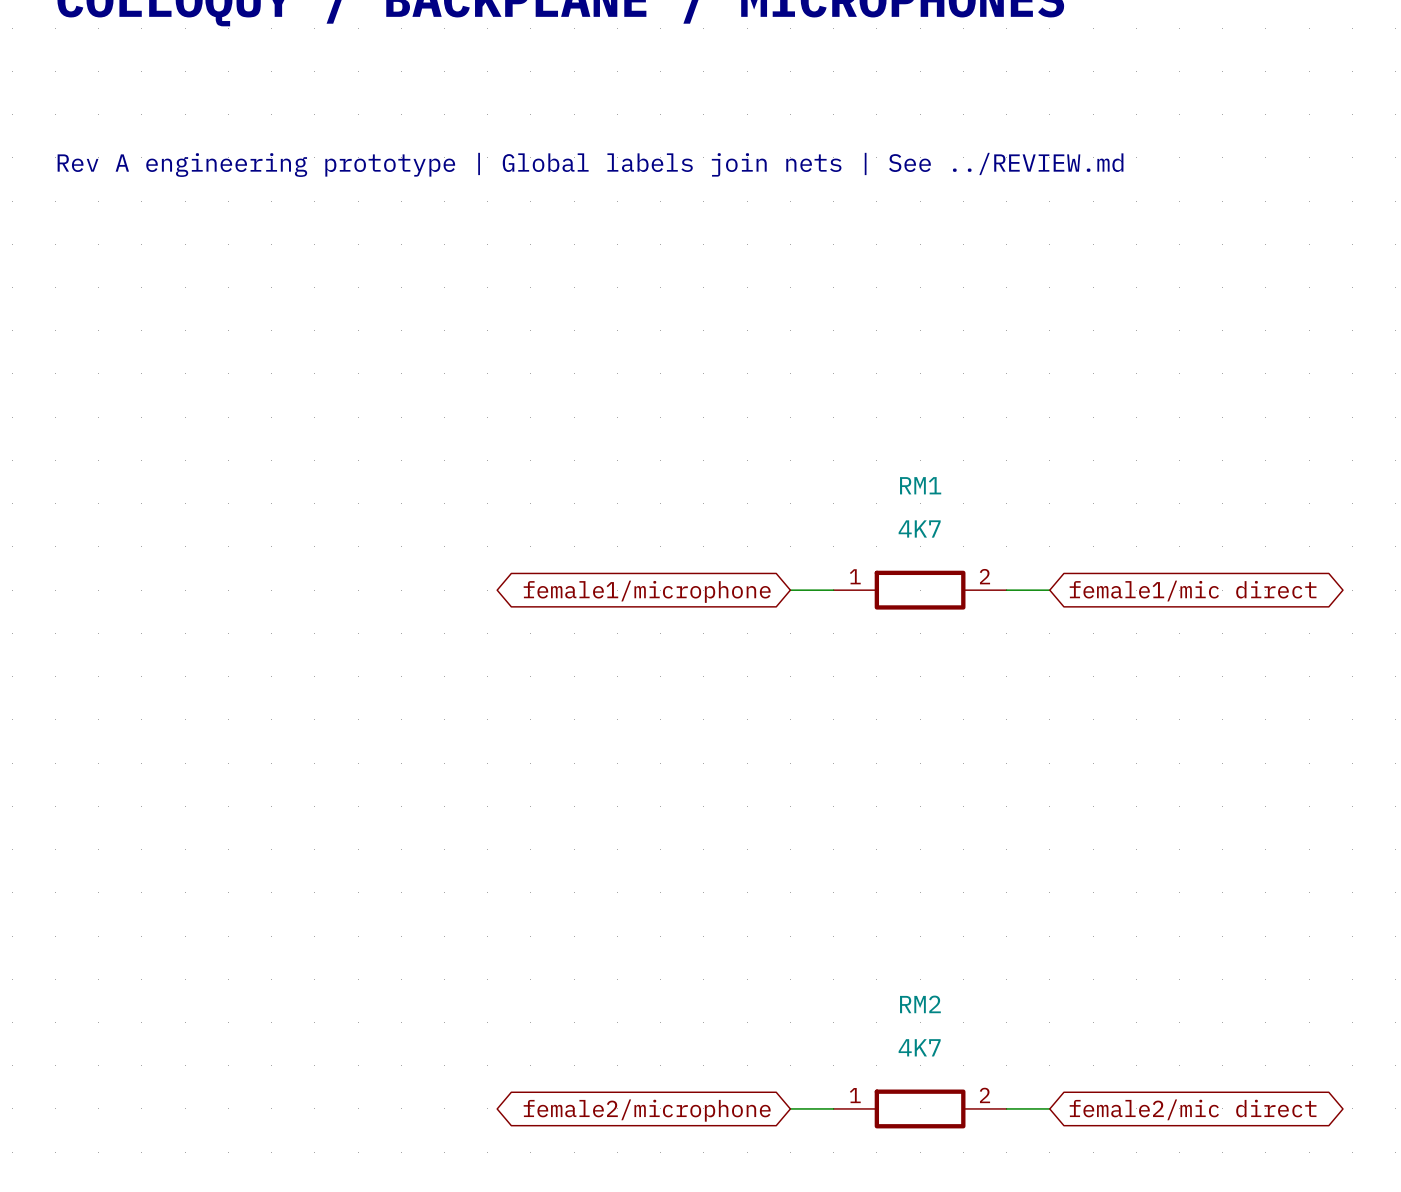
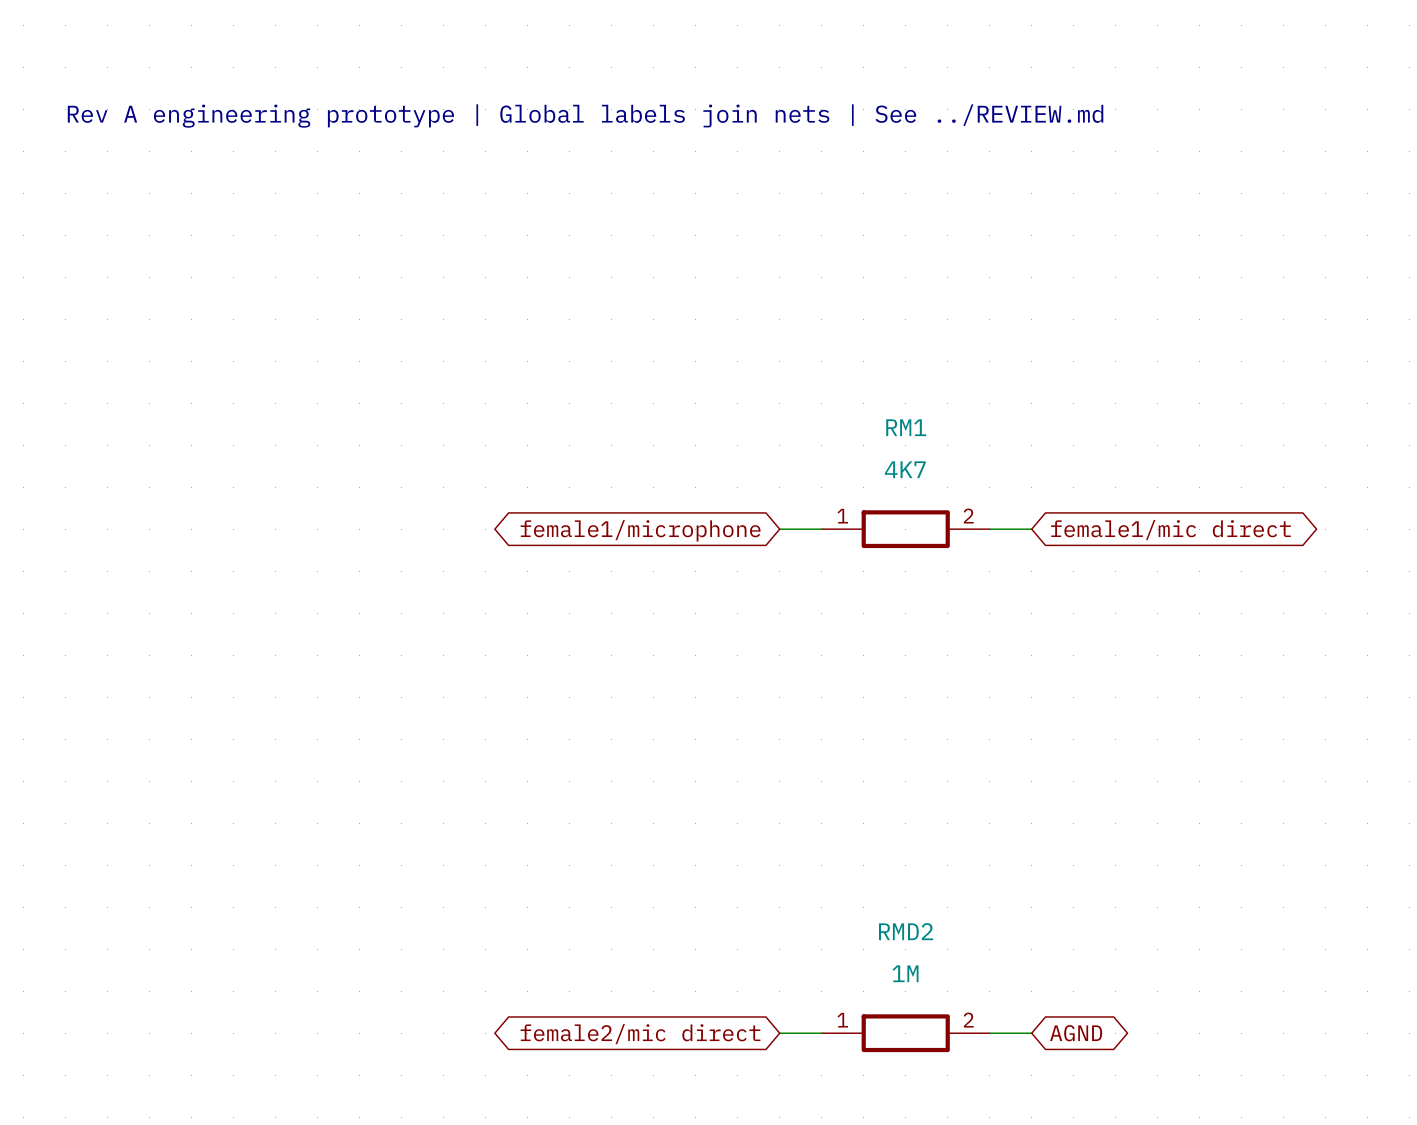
RM2 name: RM2 (920, 1004) -> RMD2 (906, 931)
RM2 value: 4K7 (919, 1047) -> 1M (905, 973)
global label: female2/mic direct (1193, 1109) -> AGND (1076, 1033)
global label: female2/microphone (647, 1110) -> female2/mic direct (640, 1034)

